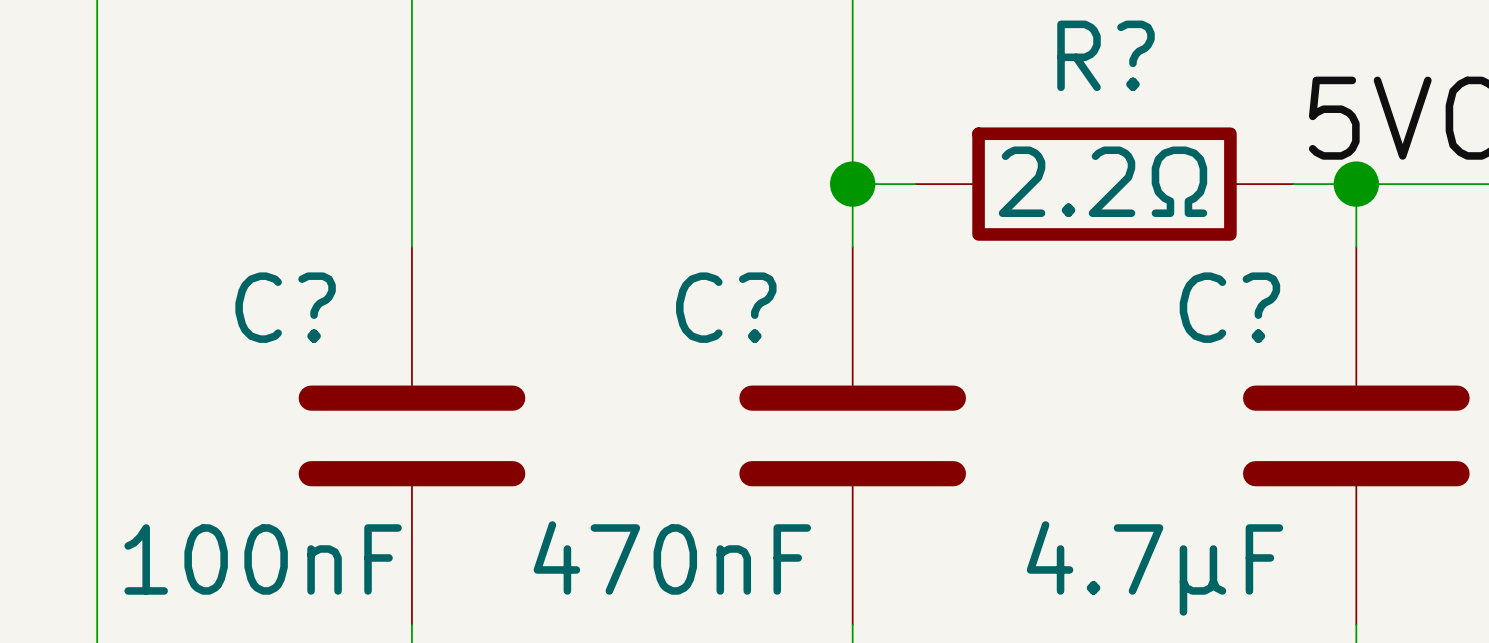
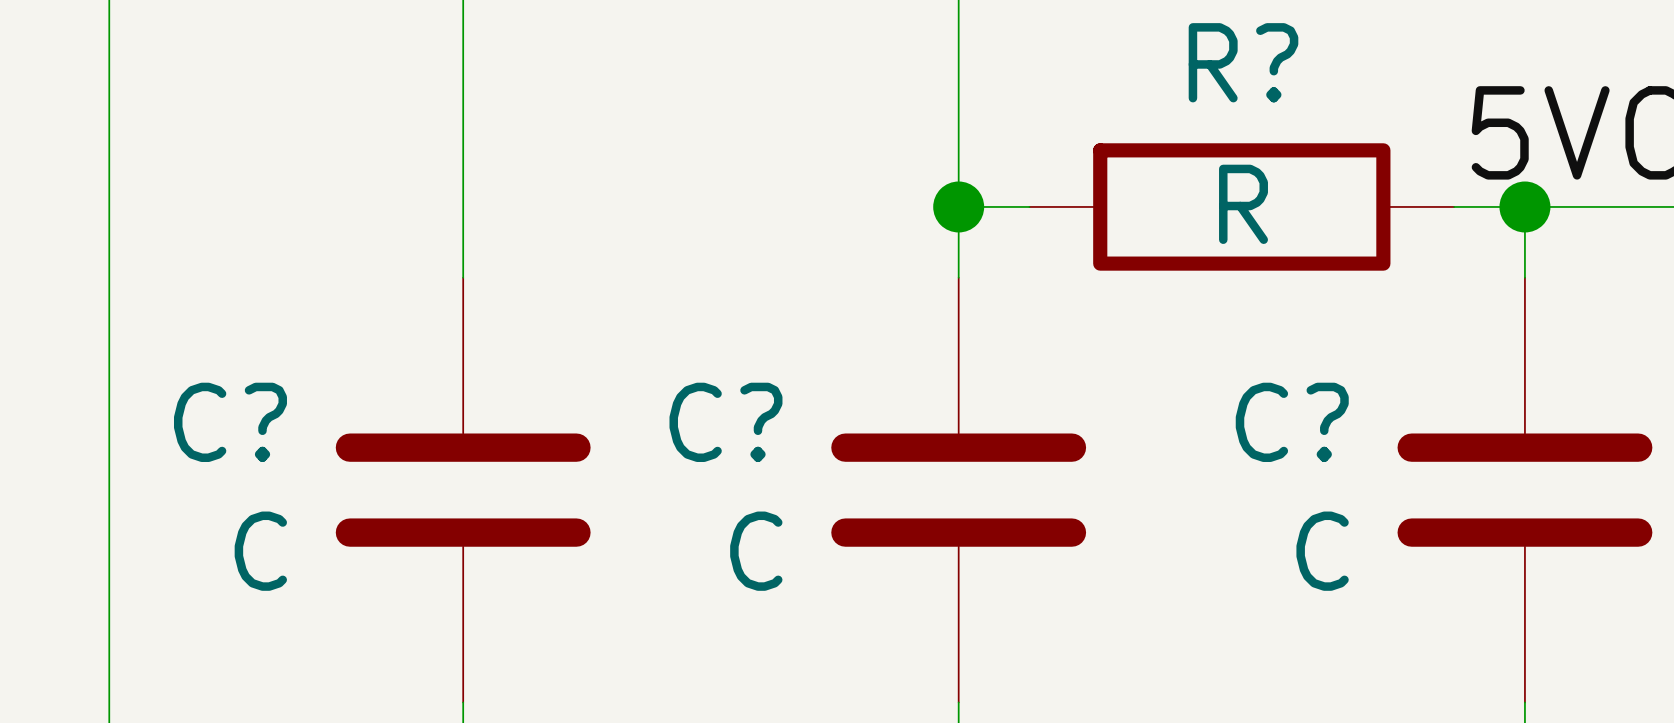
R? value: 2.2Ω (1102, 181) -> R (1243, 204)
C? name position: C? (285, 307) -> C? (230, 422)
C? name position: C? (726, 307) -> C? (725, 422)
C? name position: C? (1229, 307) -> C? (1292, 422)
C? value: 470nF (672, 557) -> C (756, 551)
C? value: 100nF (263, 559) -> C (260, 551)
C? value: 4.7μF (1154, 568) -> C (1322, 551)

